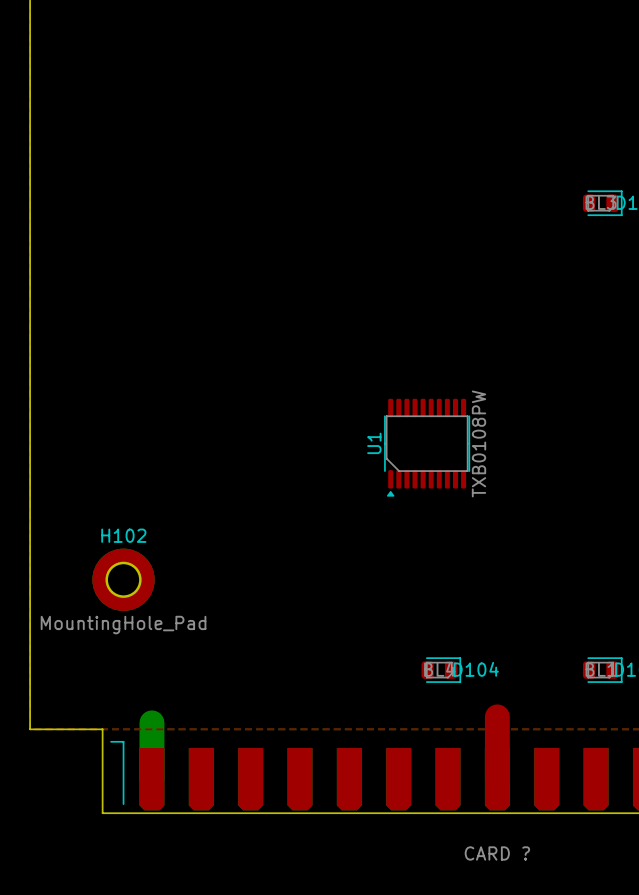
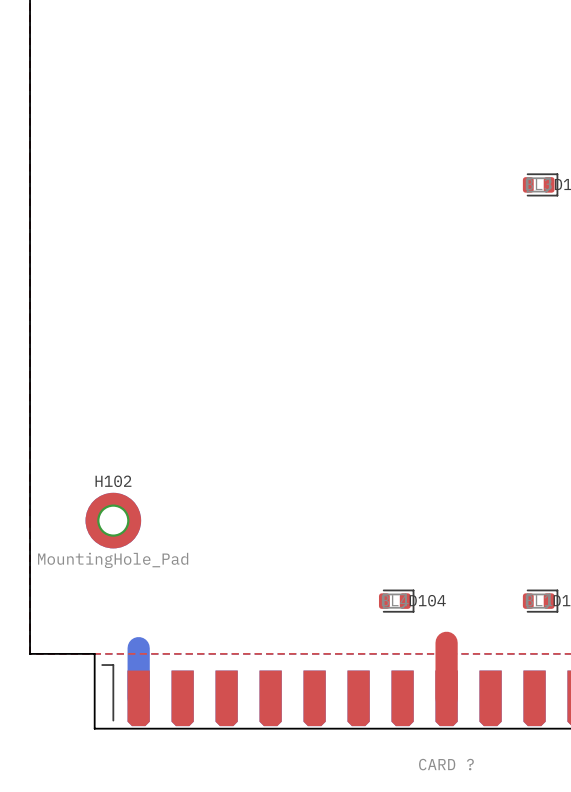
U1: TXB0108PW (427, 447) -> none

